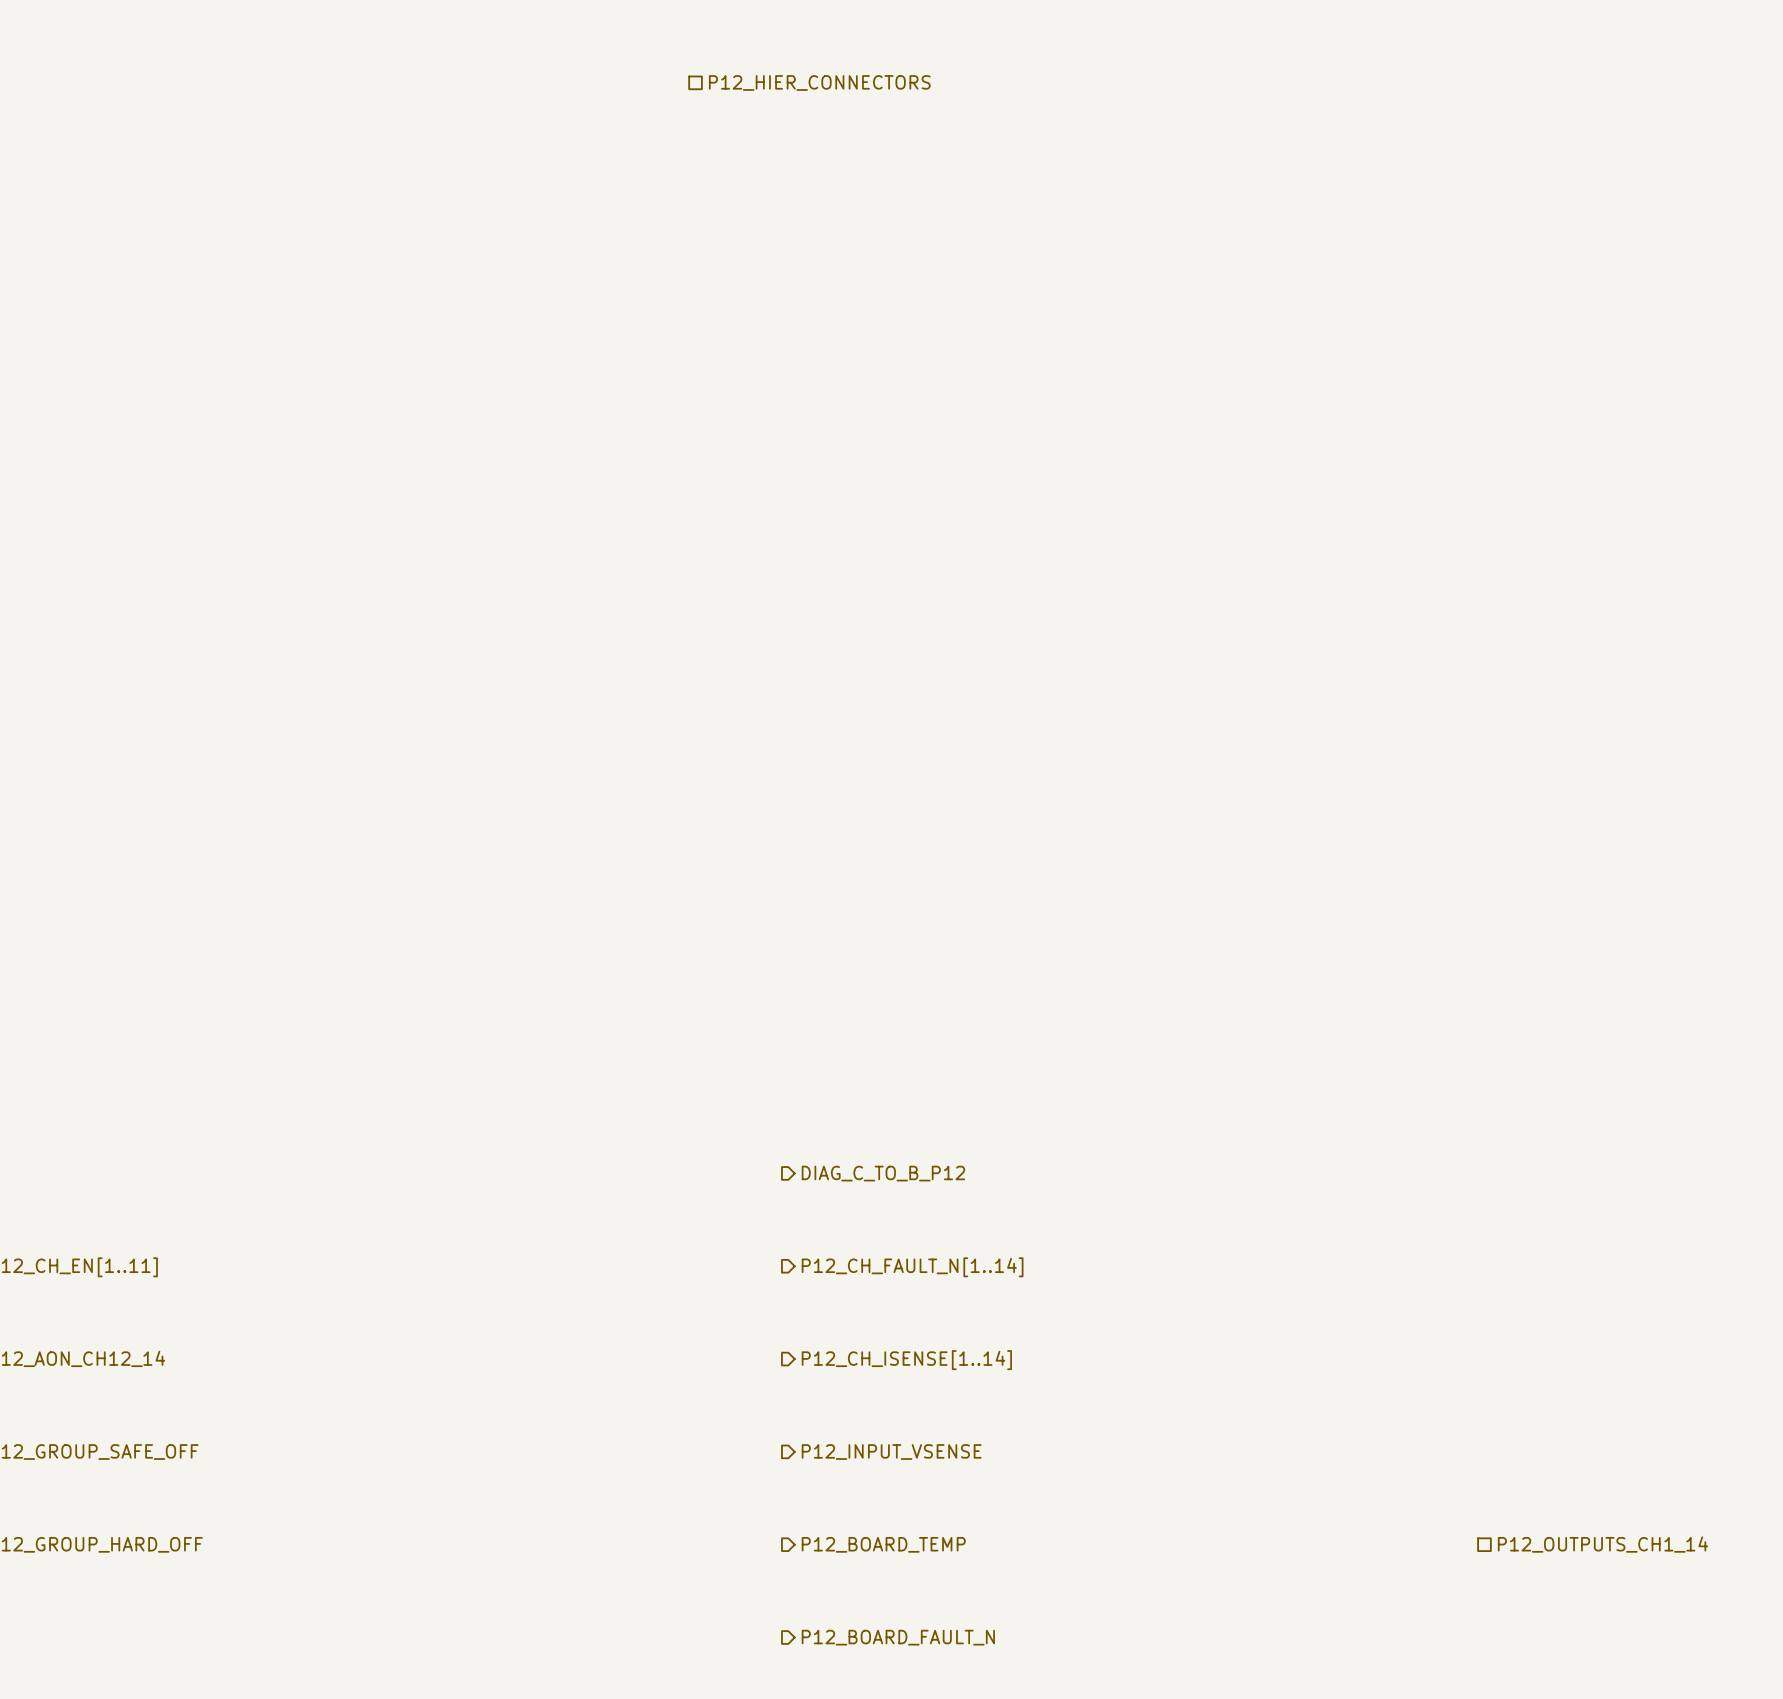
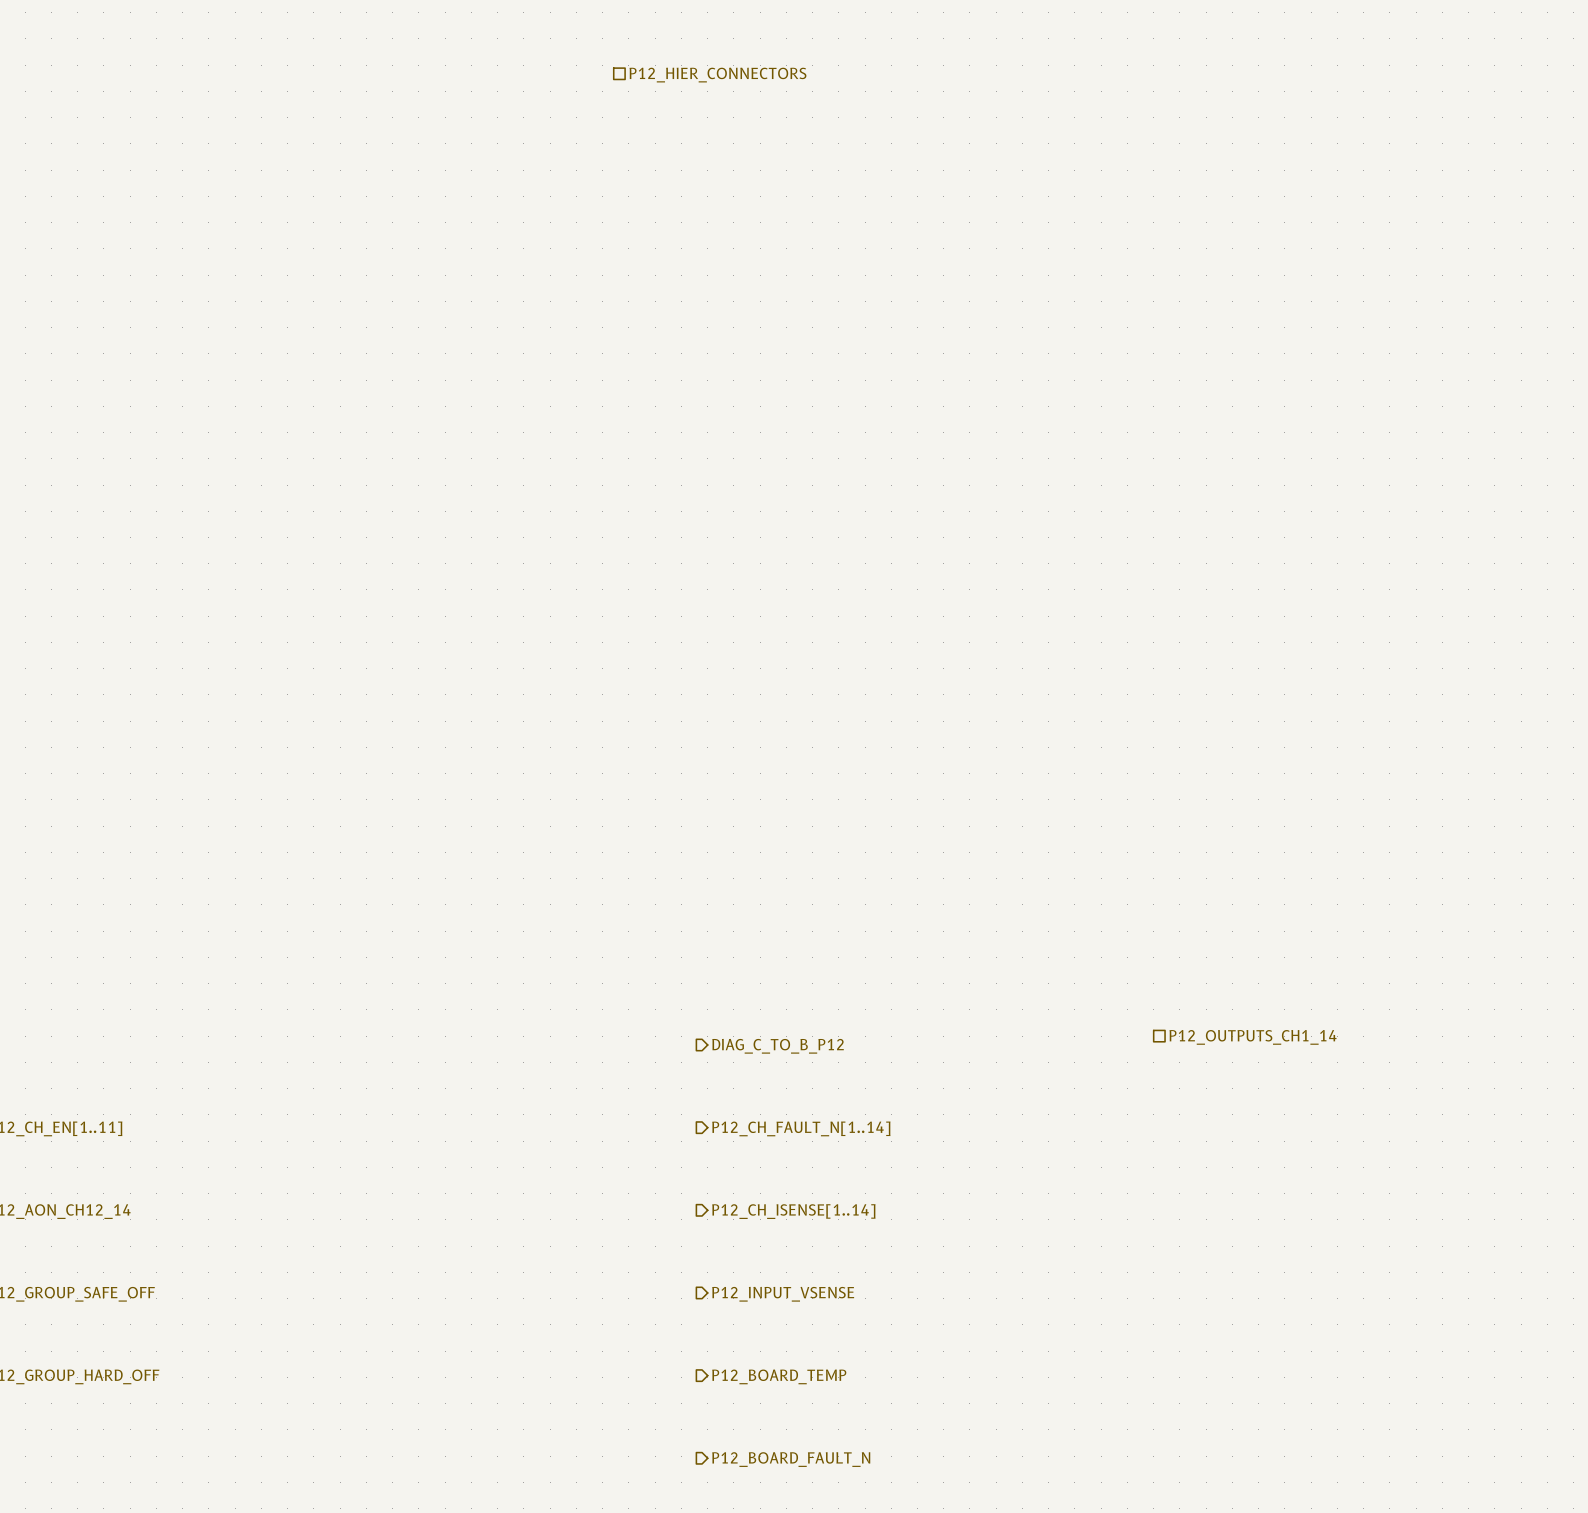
hierarchical label: none -> P12_OUTPUTS_CH1_14 (1253, 1037)
hierarchical label: P12_OUTPUTS_CH1_14 (1602, 1544) -> none

